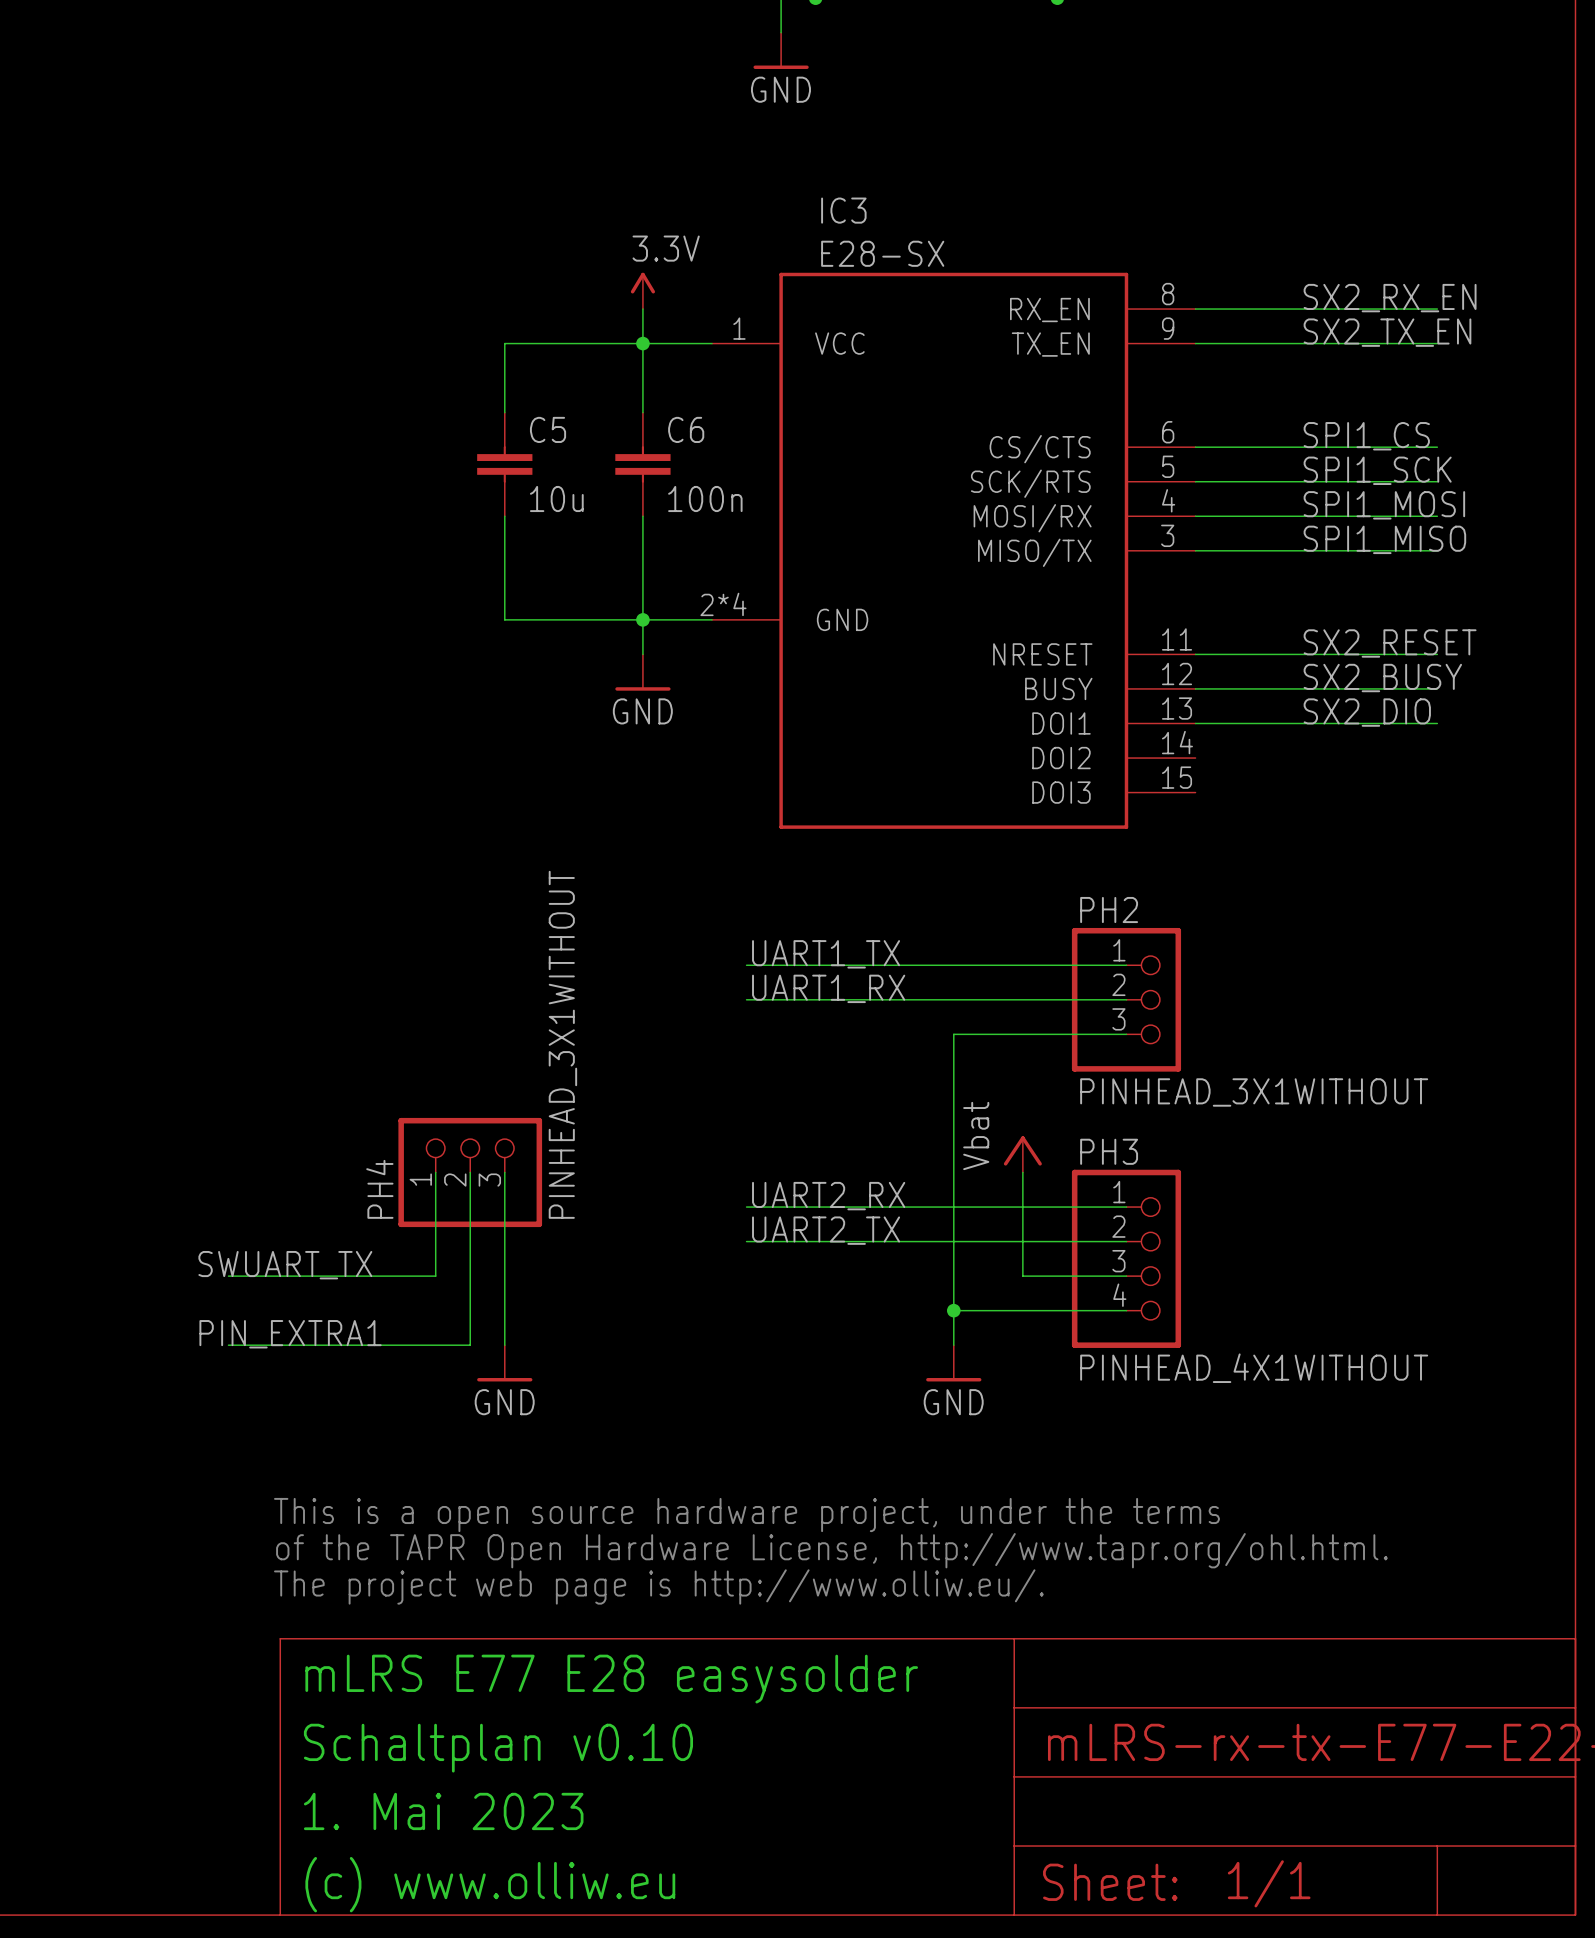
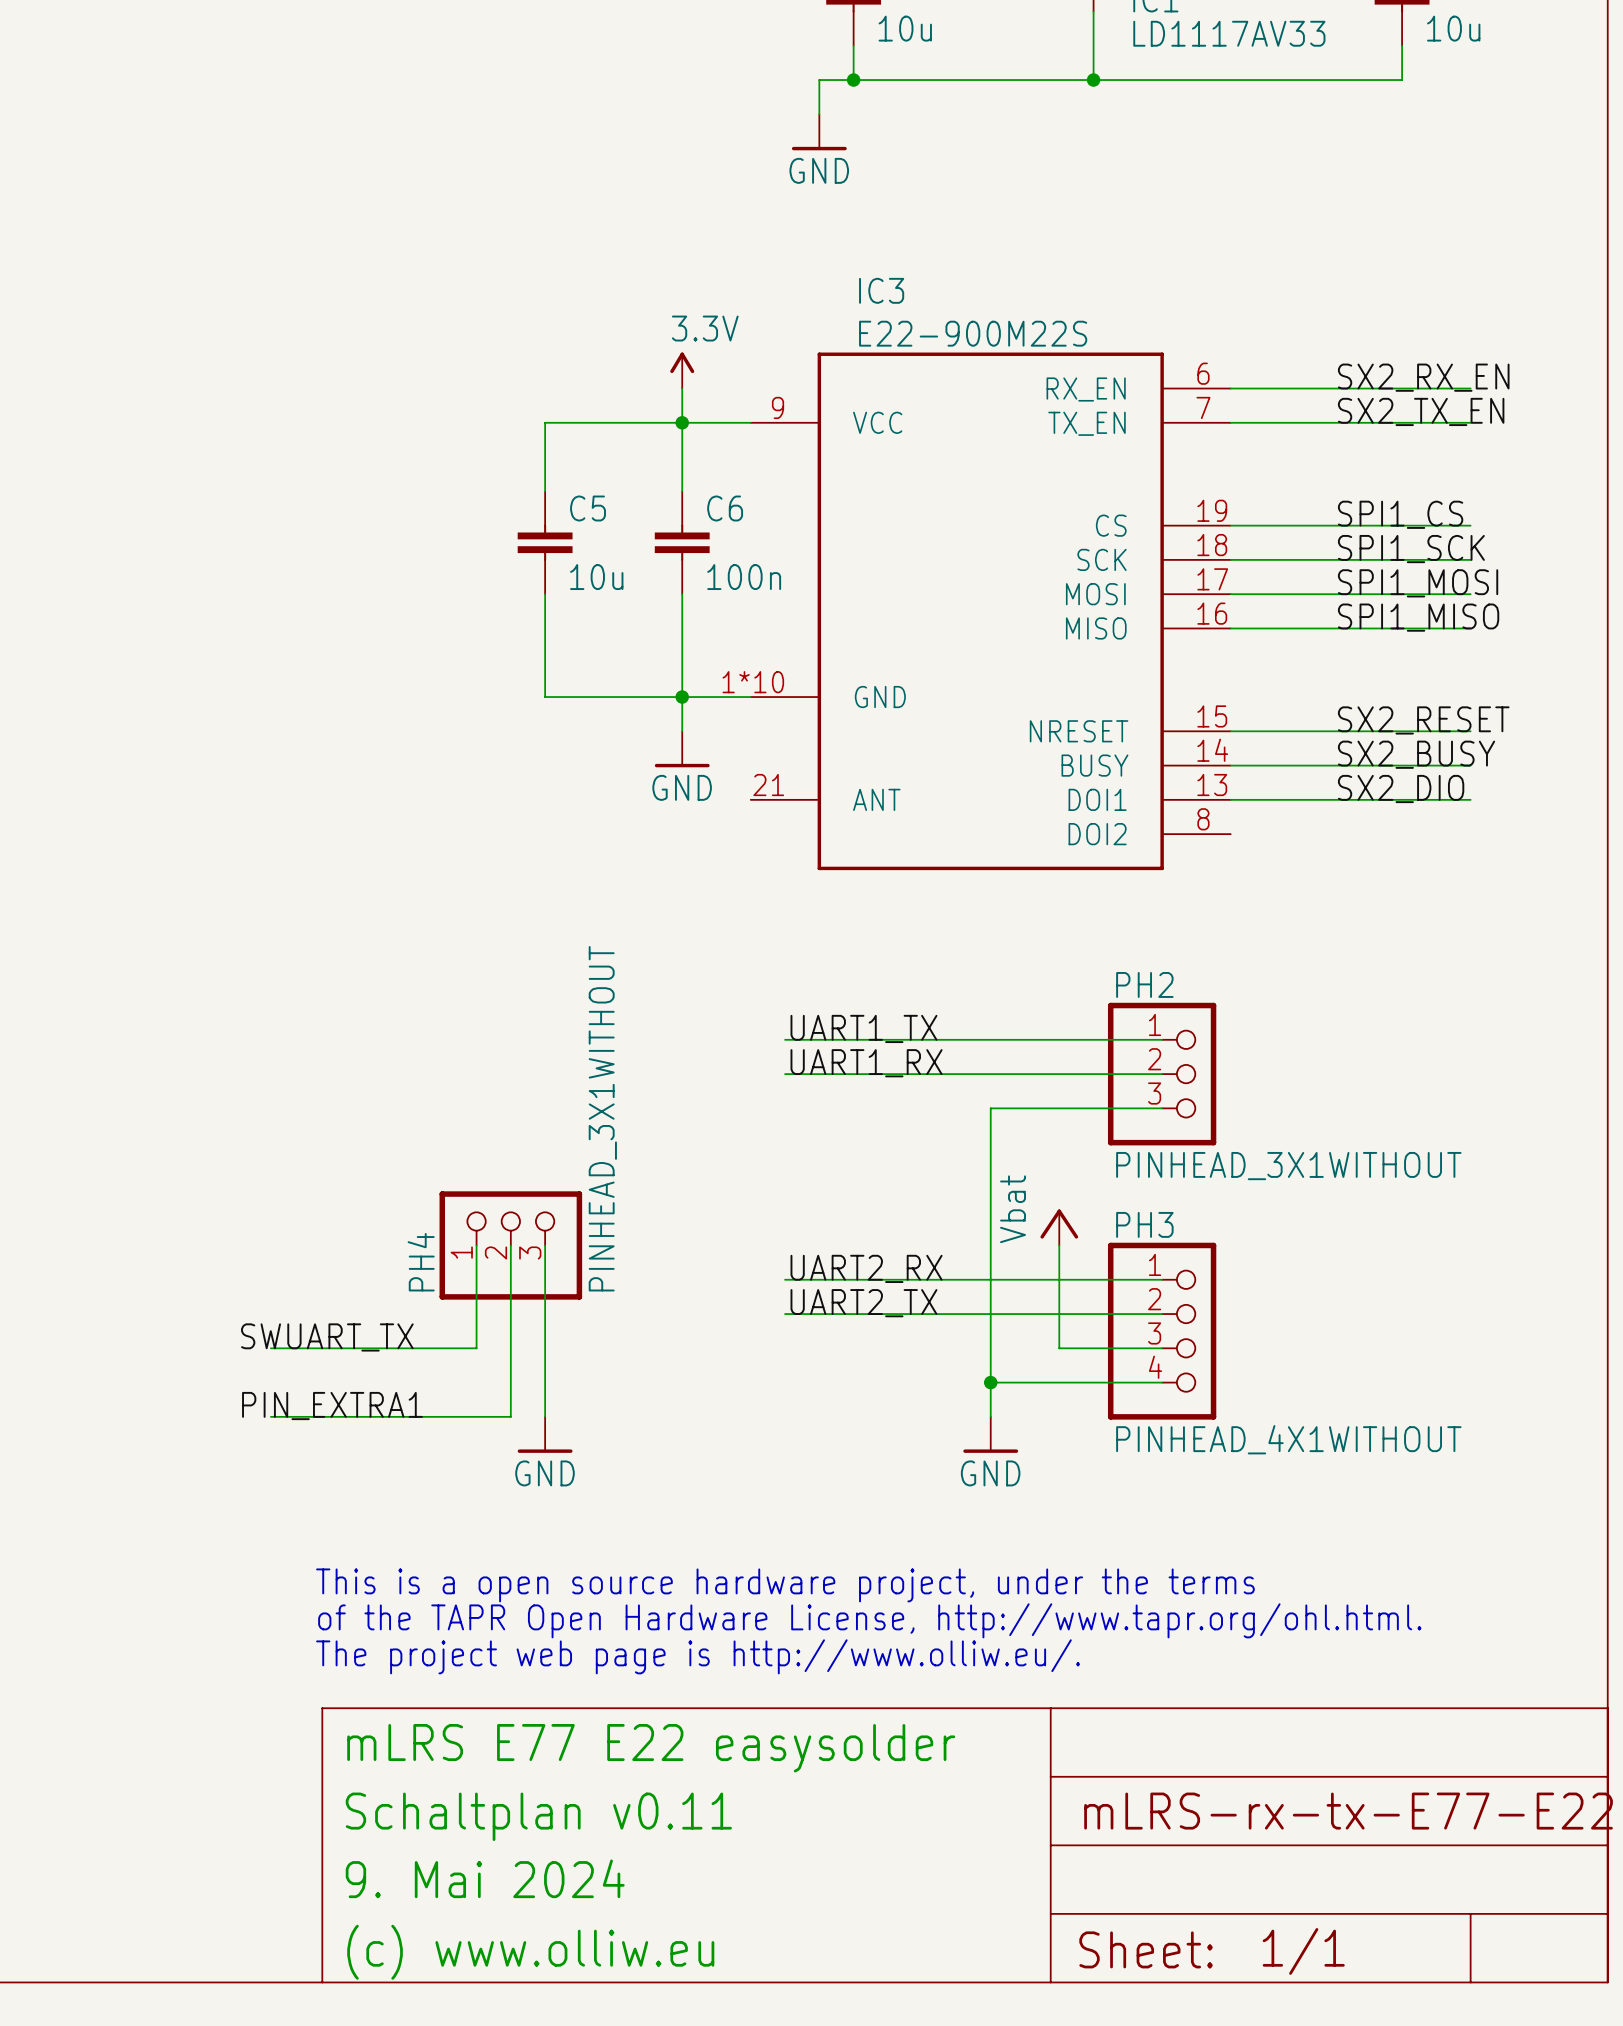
IC3 value: E28-SX (882, 253) -> E22-900M22S (973, 333)
IC3 symbol: [712, 272, 1196, 829] -> [750, 352, 1231, 871]
text: mLRS E77 E28 easysolder (611, 1679) -> mLRS E77 E22 easysolder (651, 1748)
text: Schaltplan v0.10 (498, 1748) -> Schaltplan v0.11 (538, 1816)
text: 1. Mai 2023 (443, 1811) -> 9. Mai 2024 (485, 1878)

